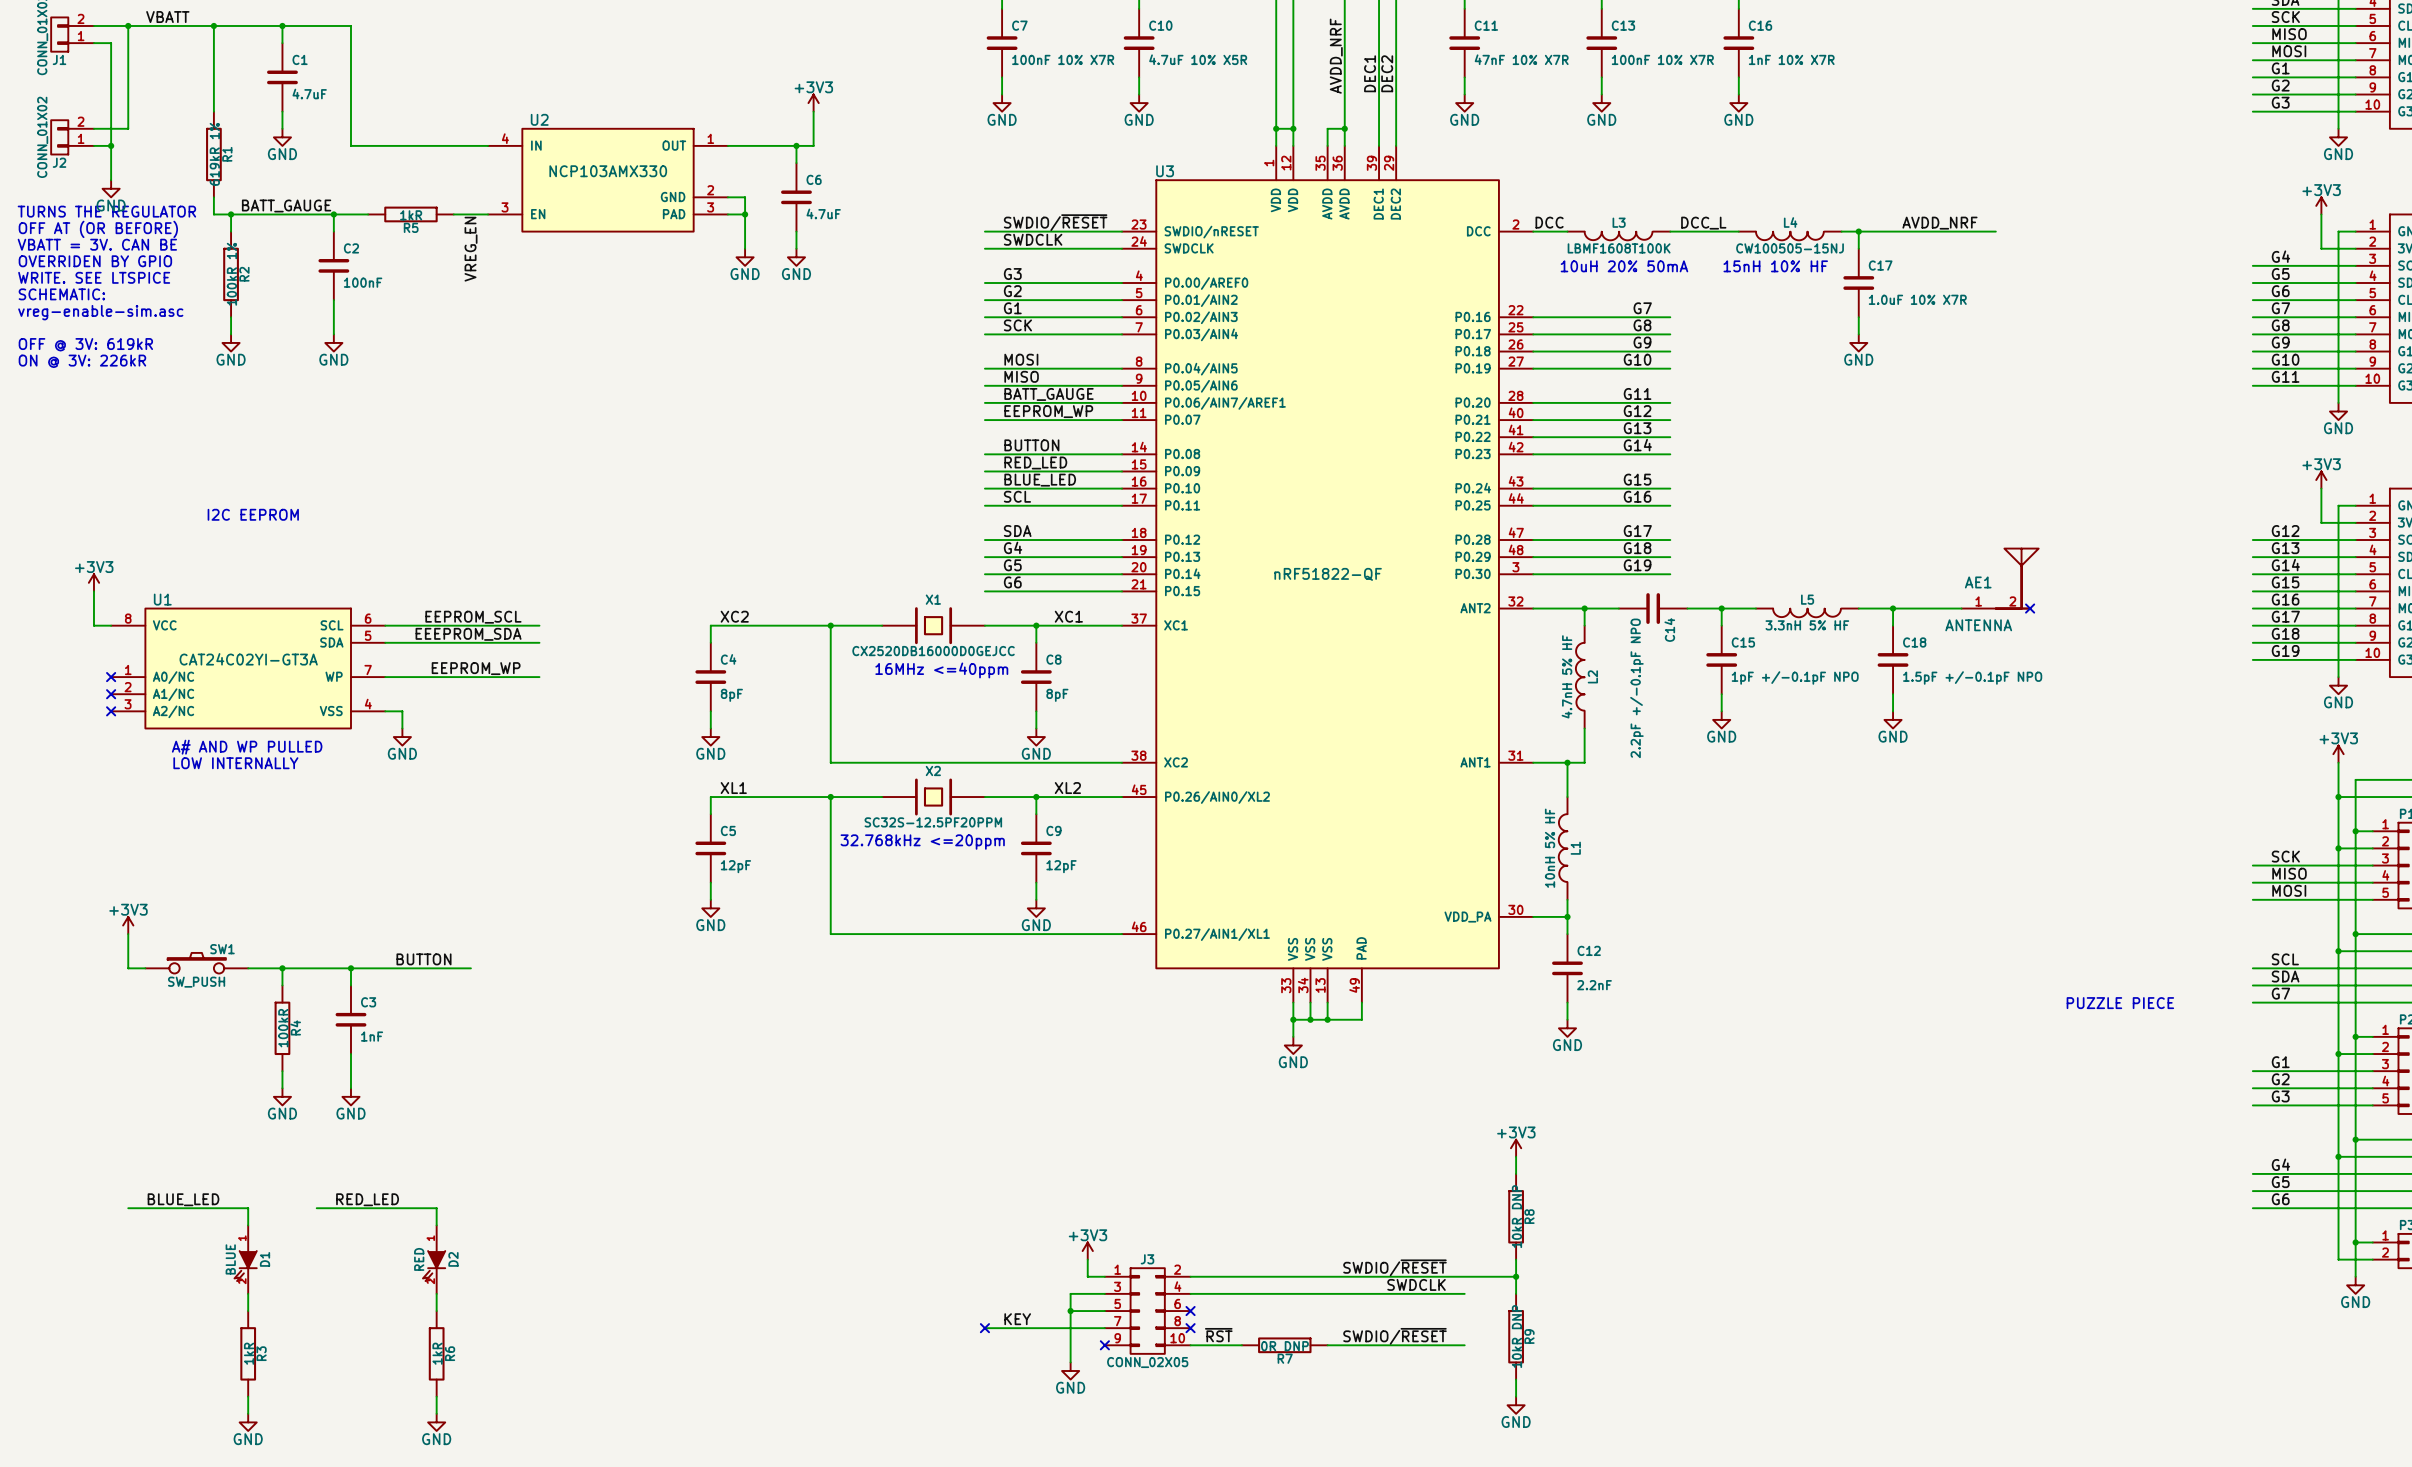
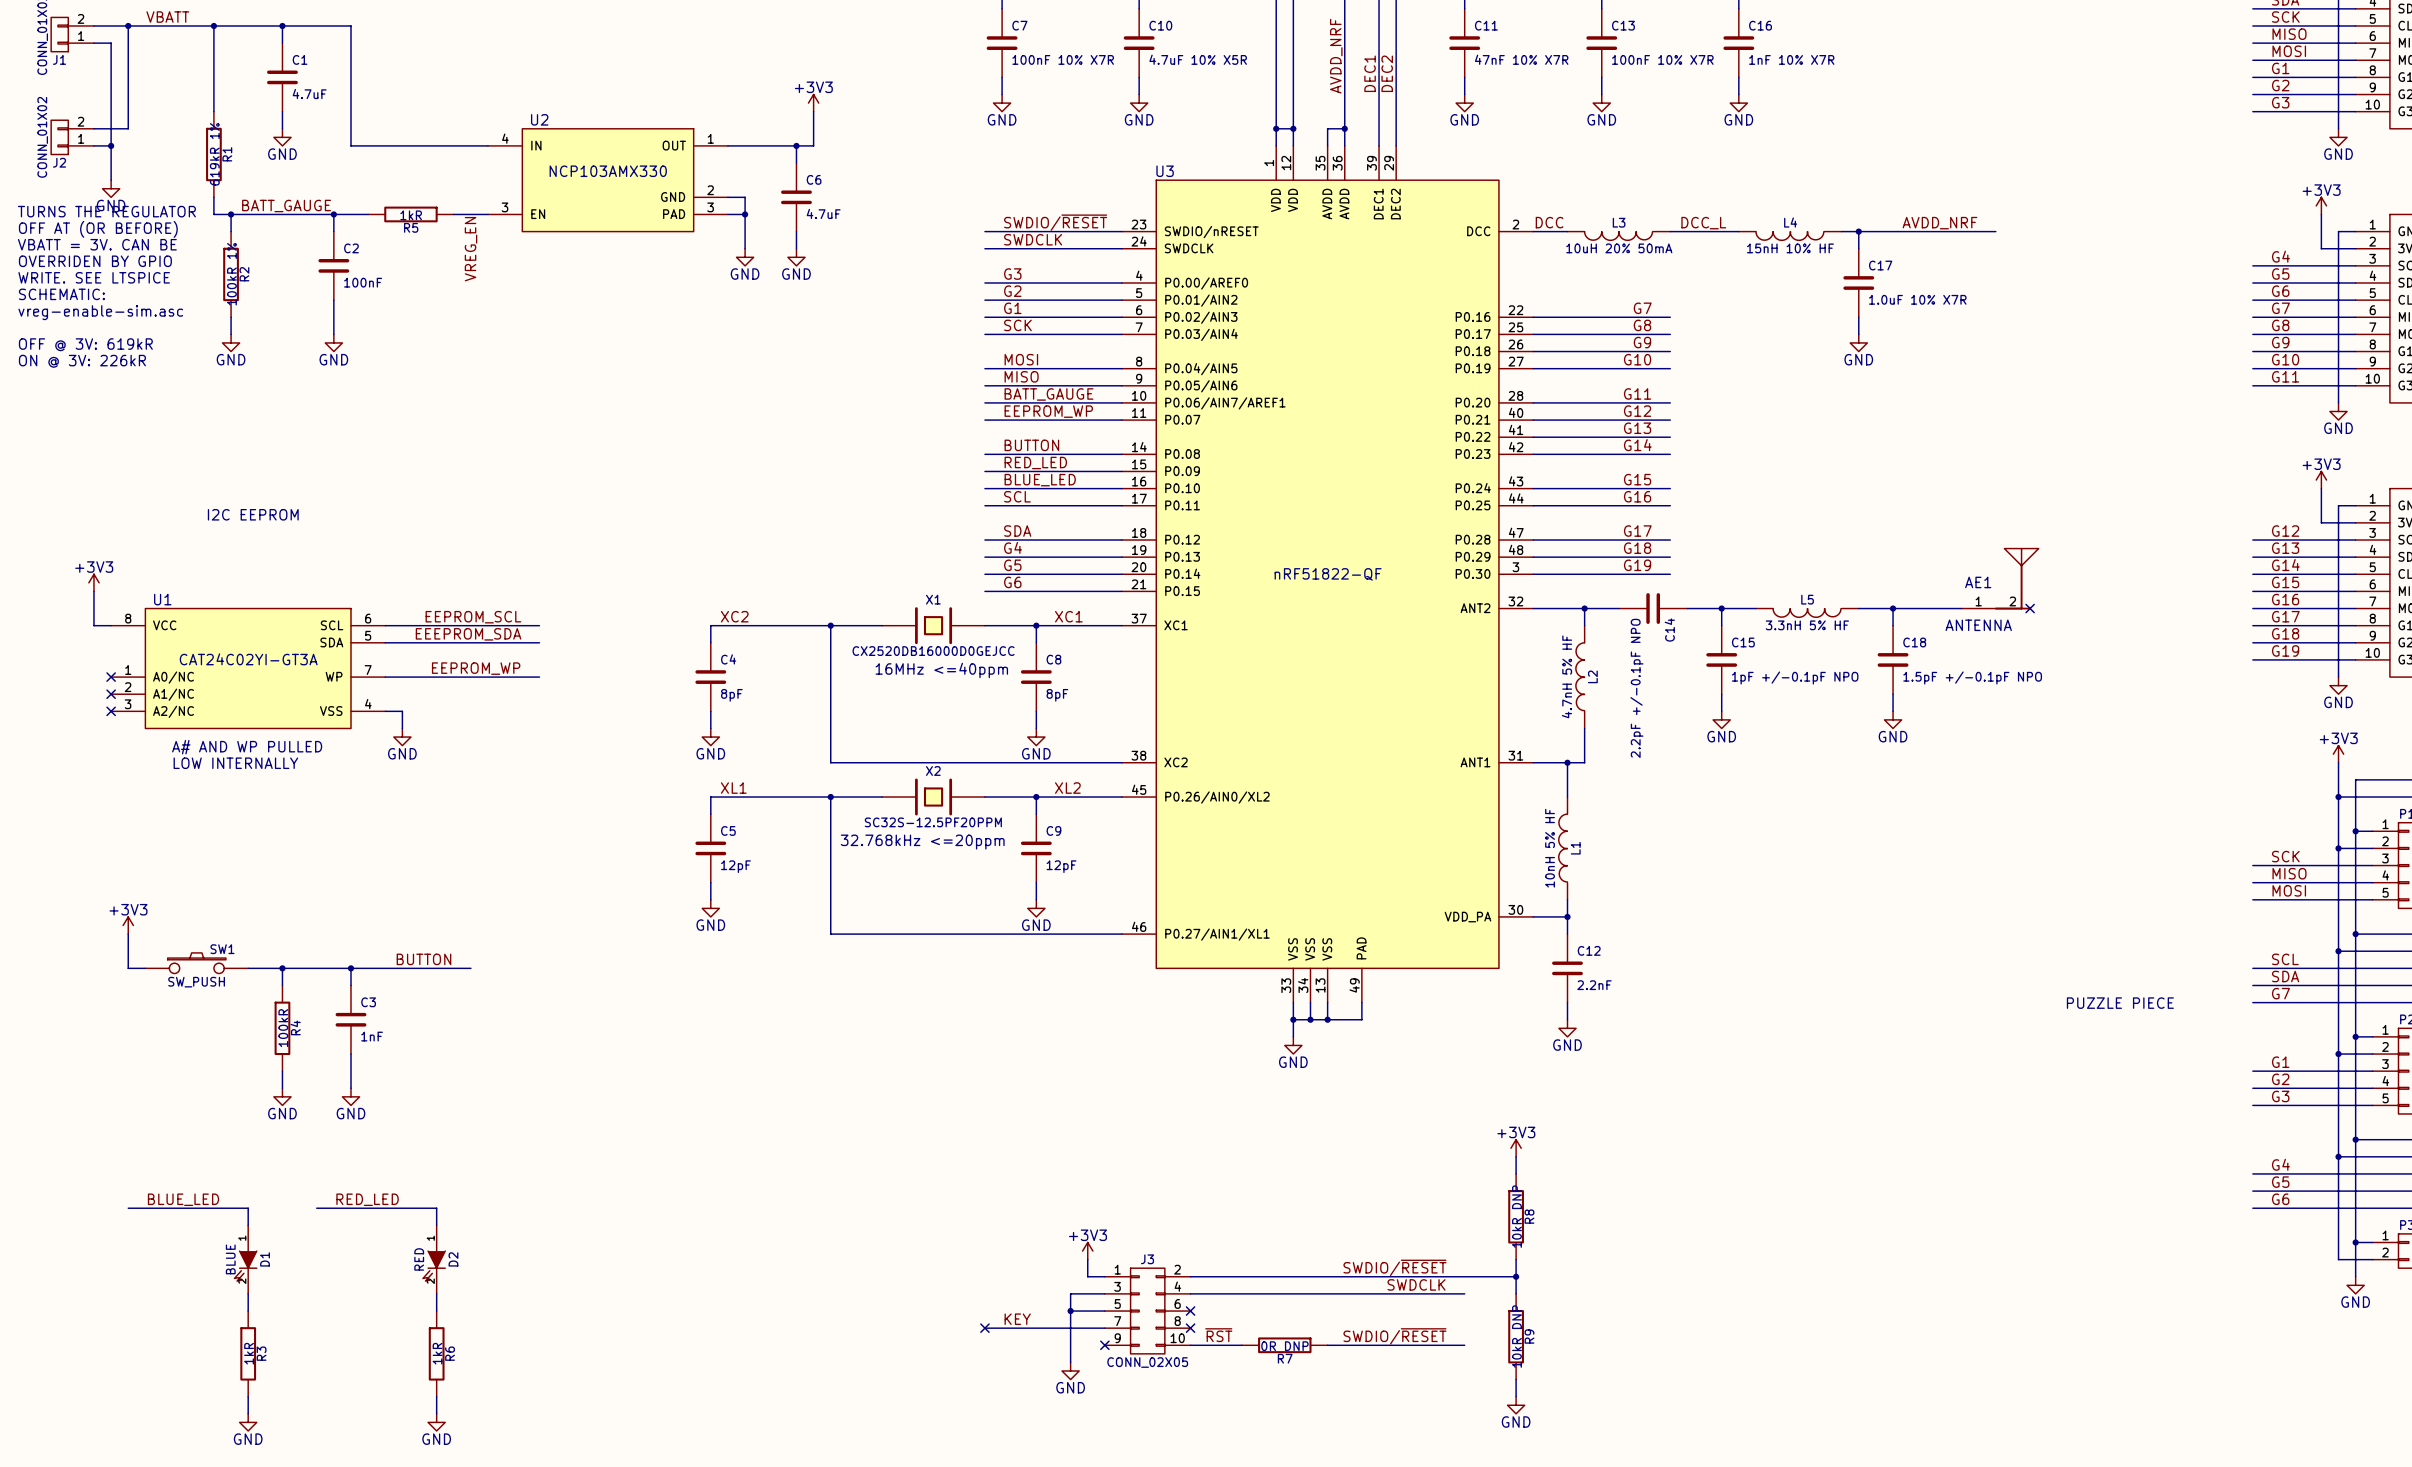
L3 value: LBMF1608T100K (1619, 248) -> 10uH 20% 50mA (1619, 248)
L4 value: CW100505-15NJ (1790, 248) -> 15nH 10% HF (1790, 248)
text: 10uH 20% 50mA (1624, 266) -> none
text: 15nH 10% HF (1775, 266) -> none

